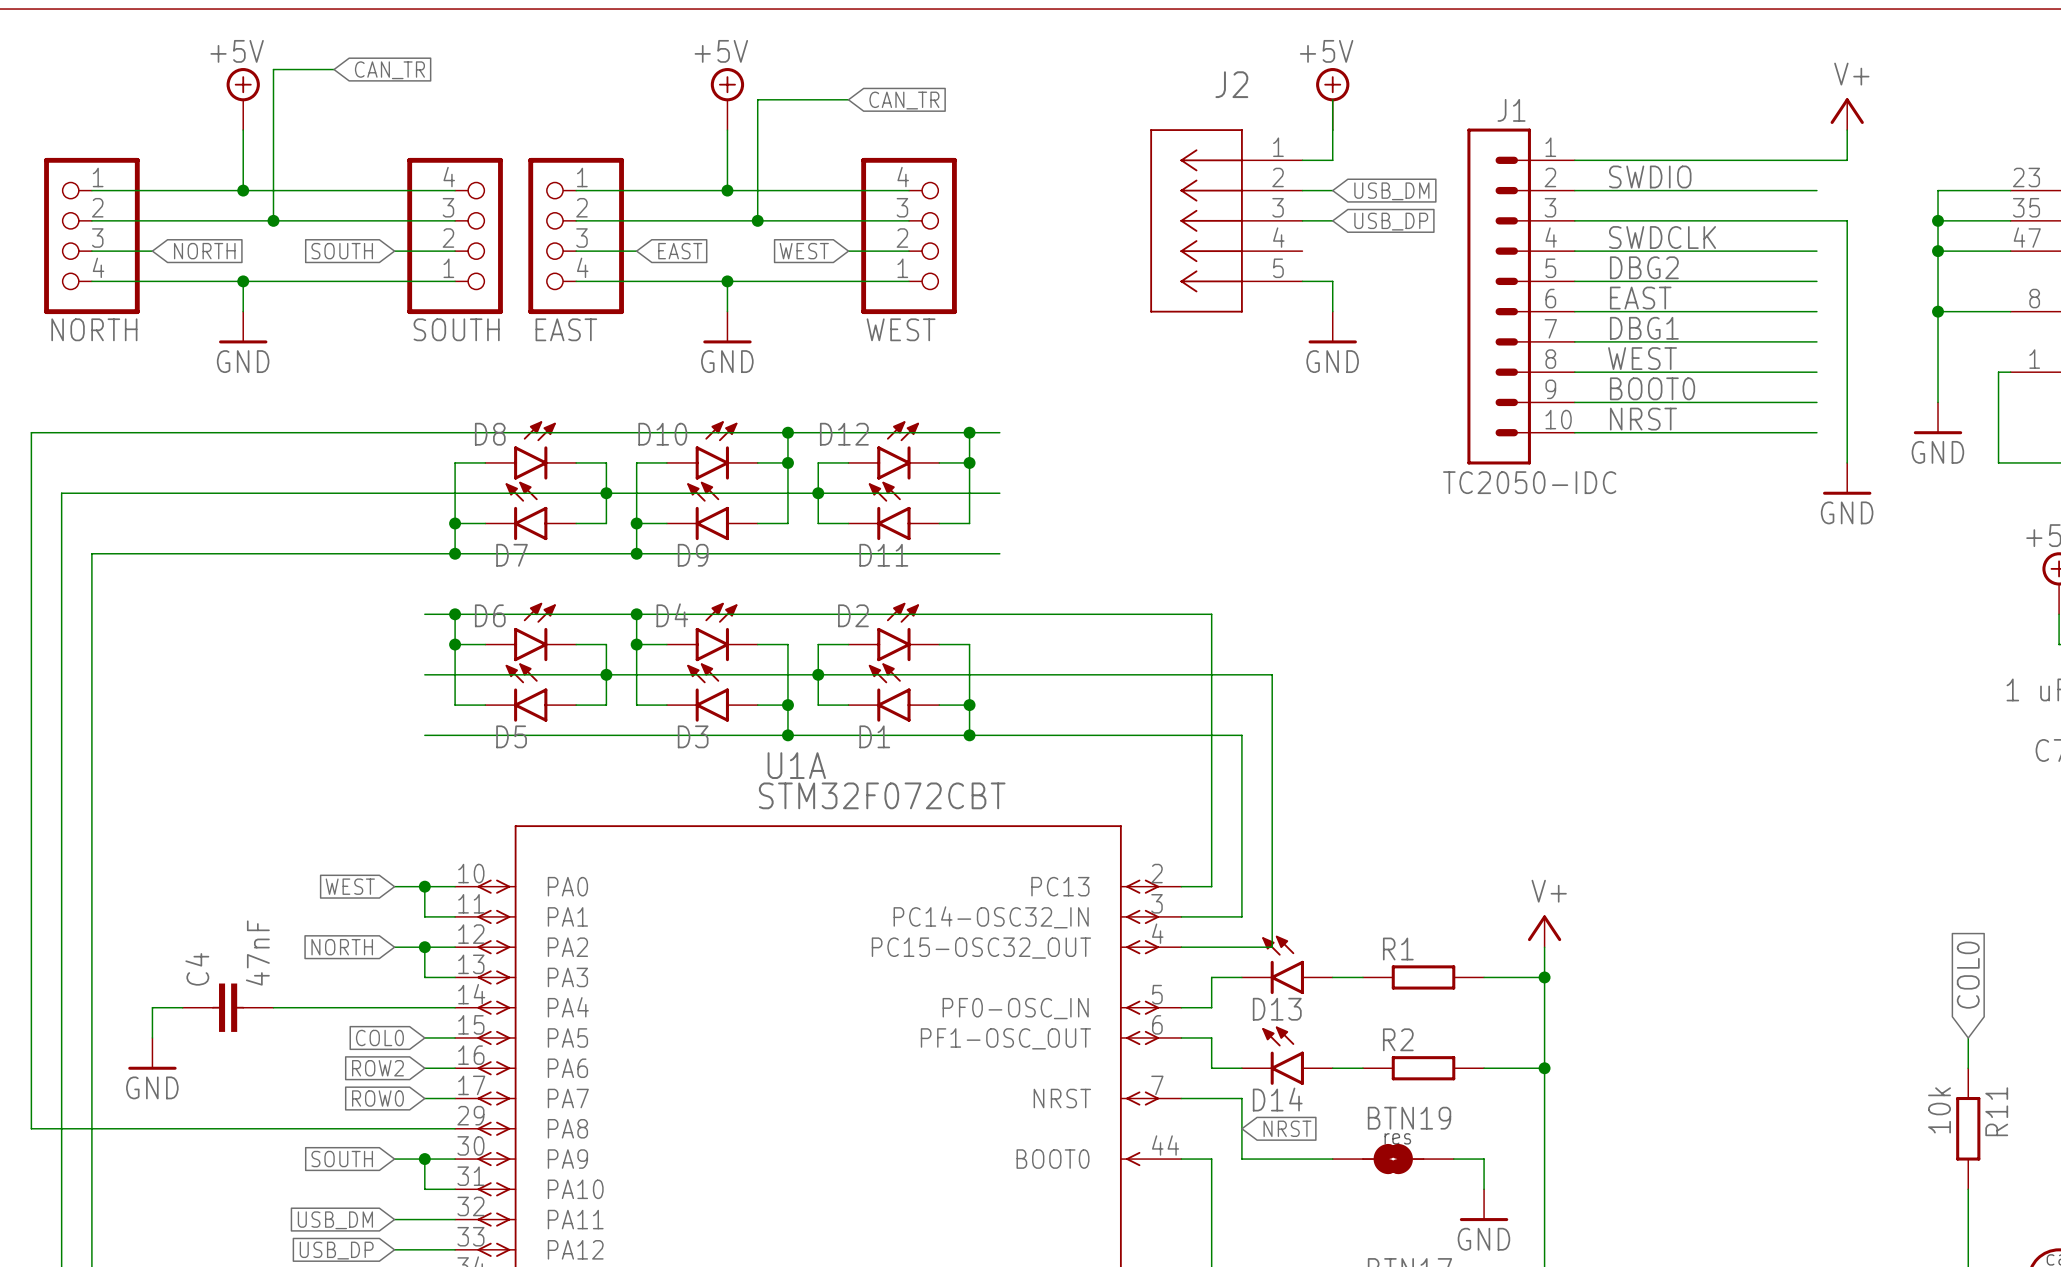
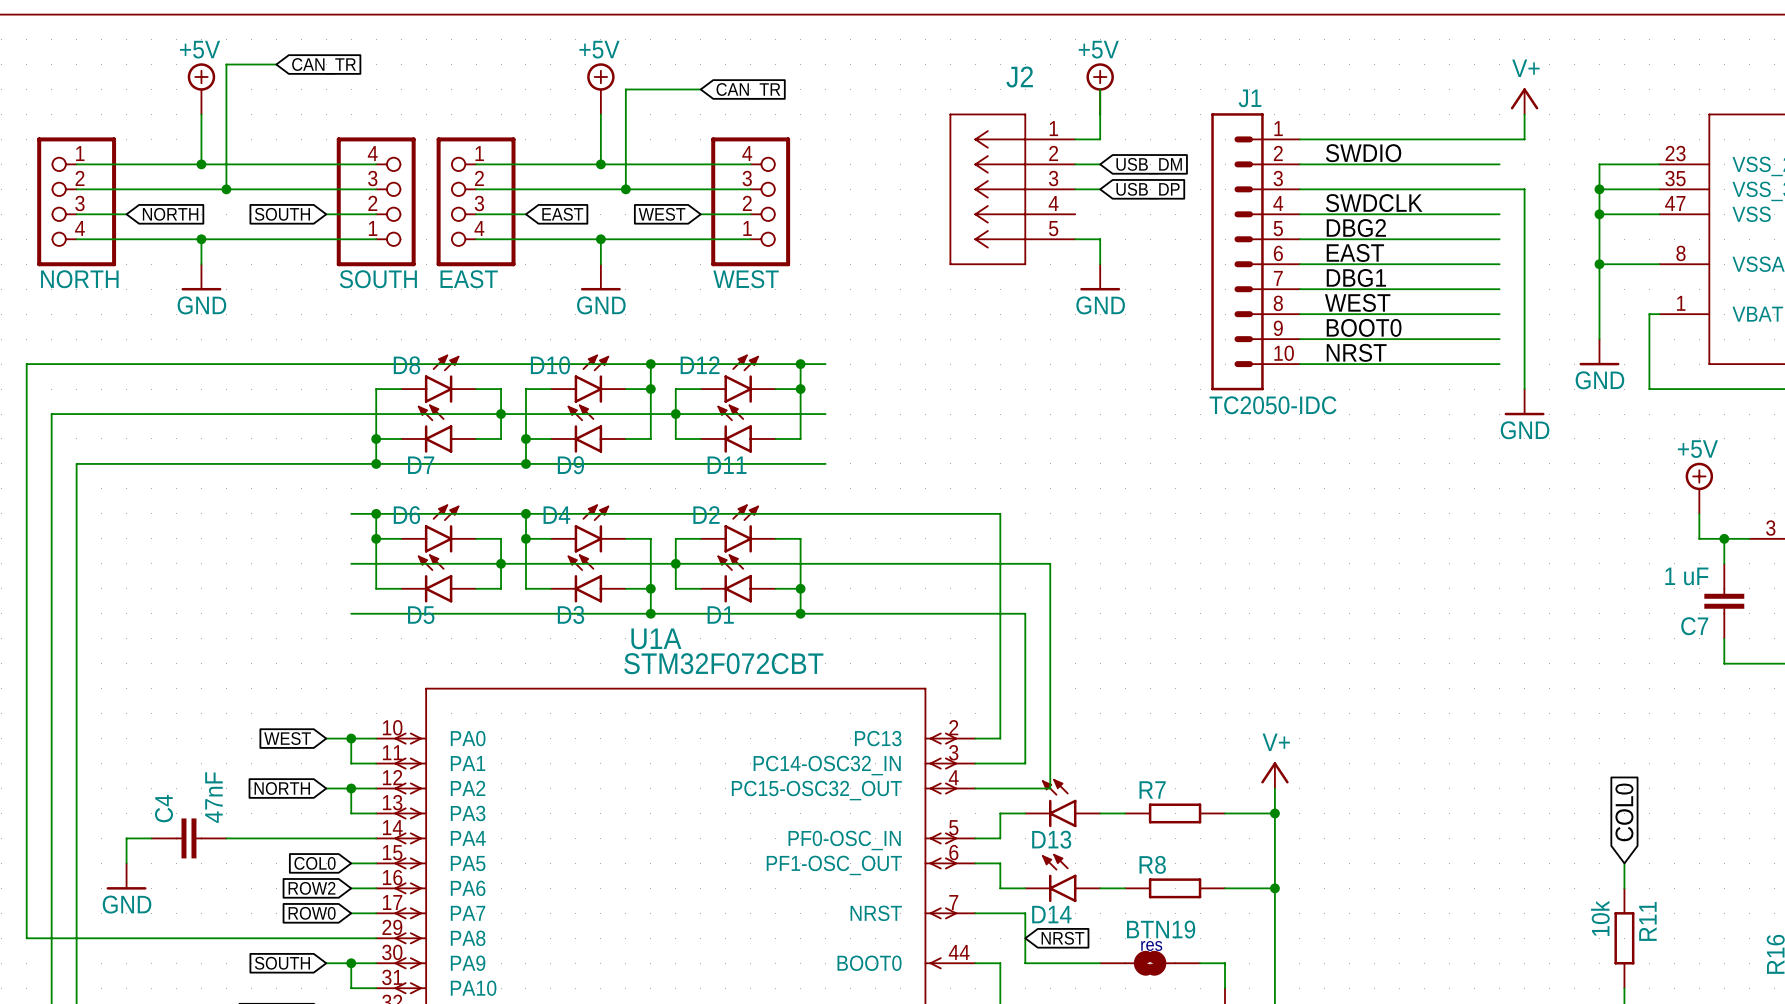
R1 name: R1 (1398, 949) -> R7 (1152, 790)
R2 name: R2 (1398, 1039) -> R8 (1152, 864)

